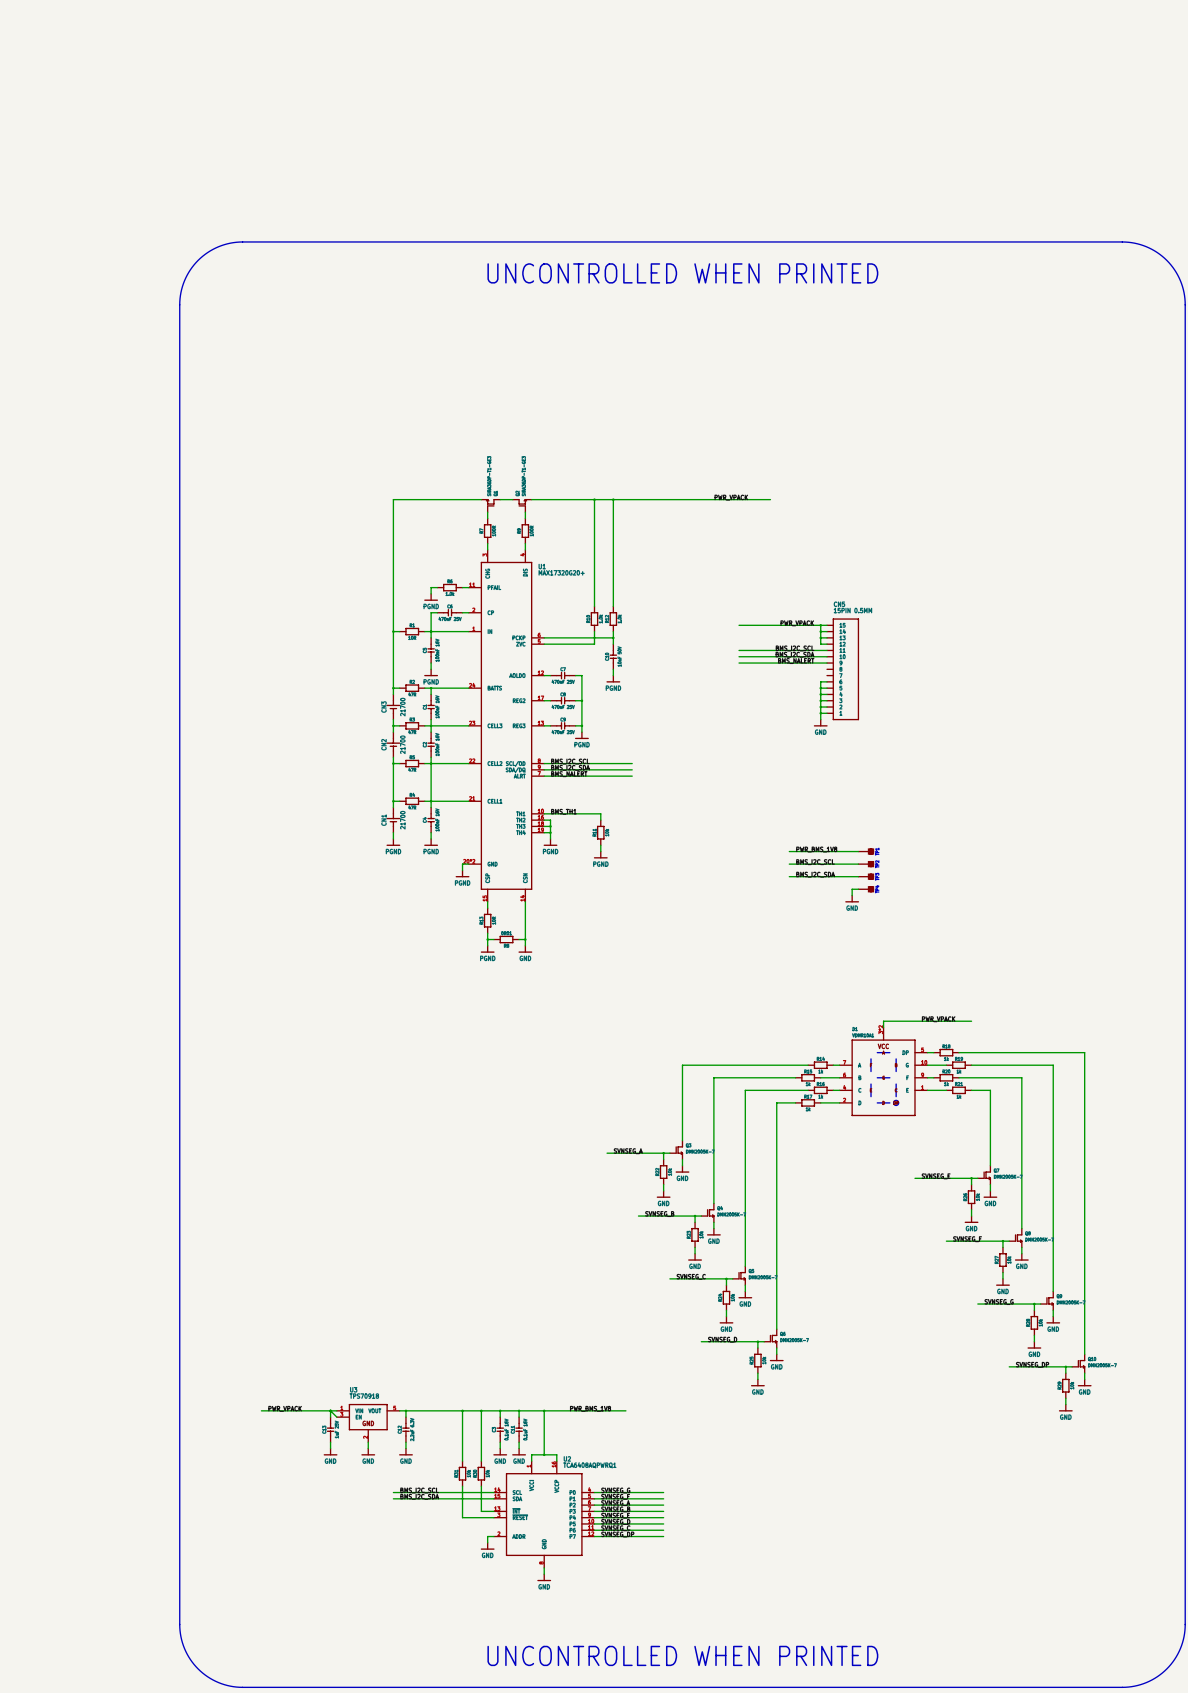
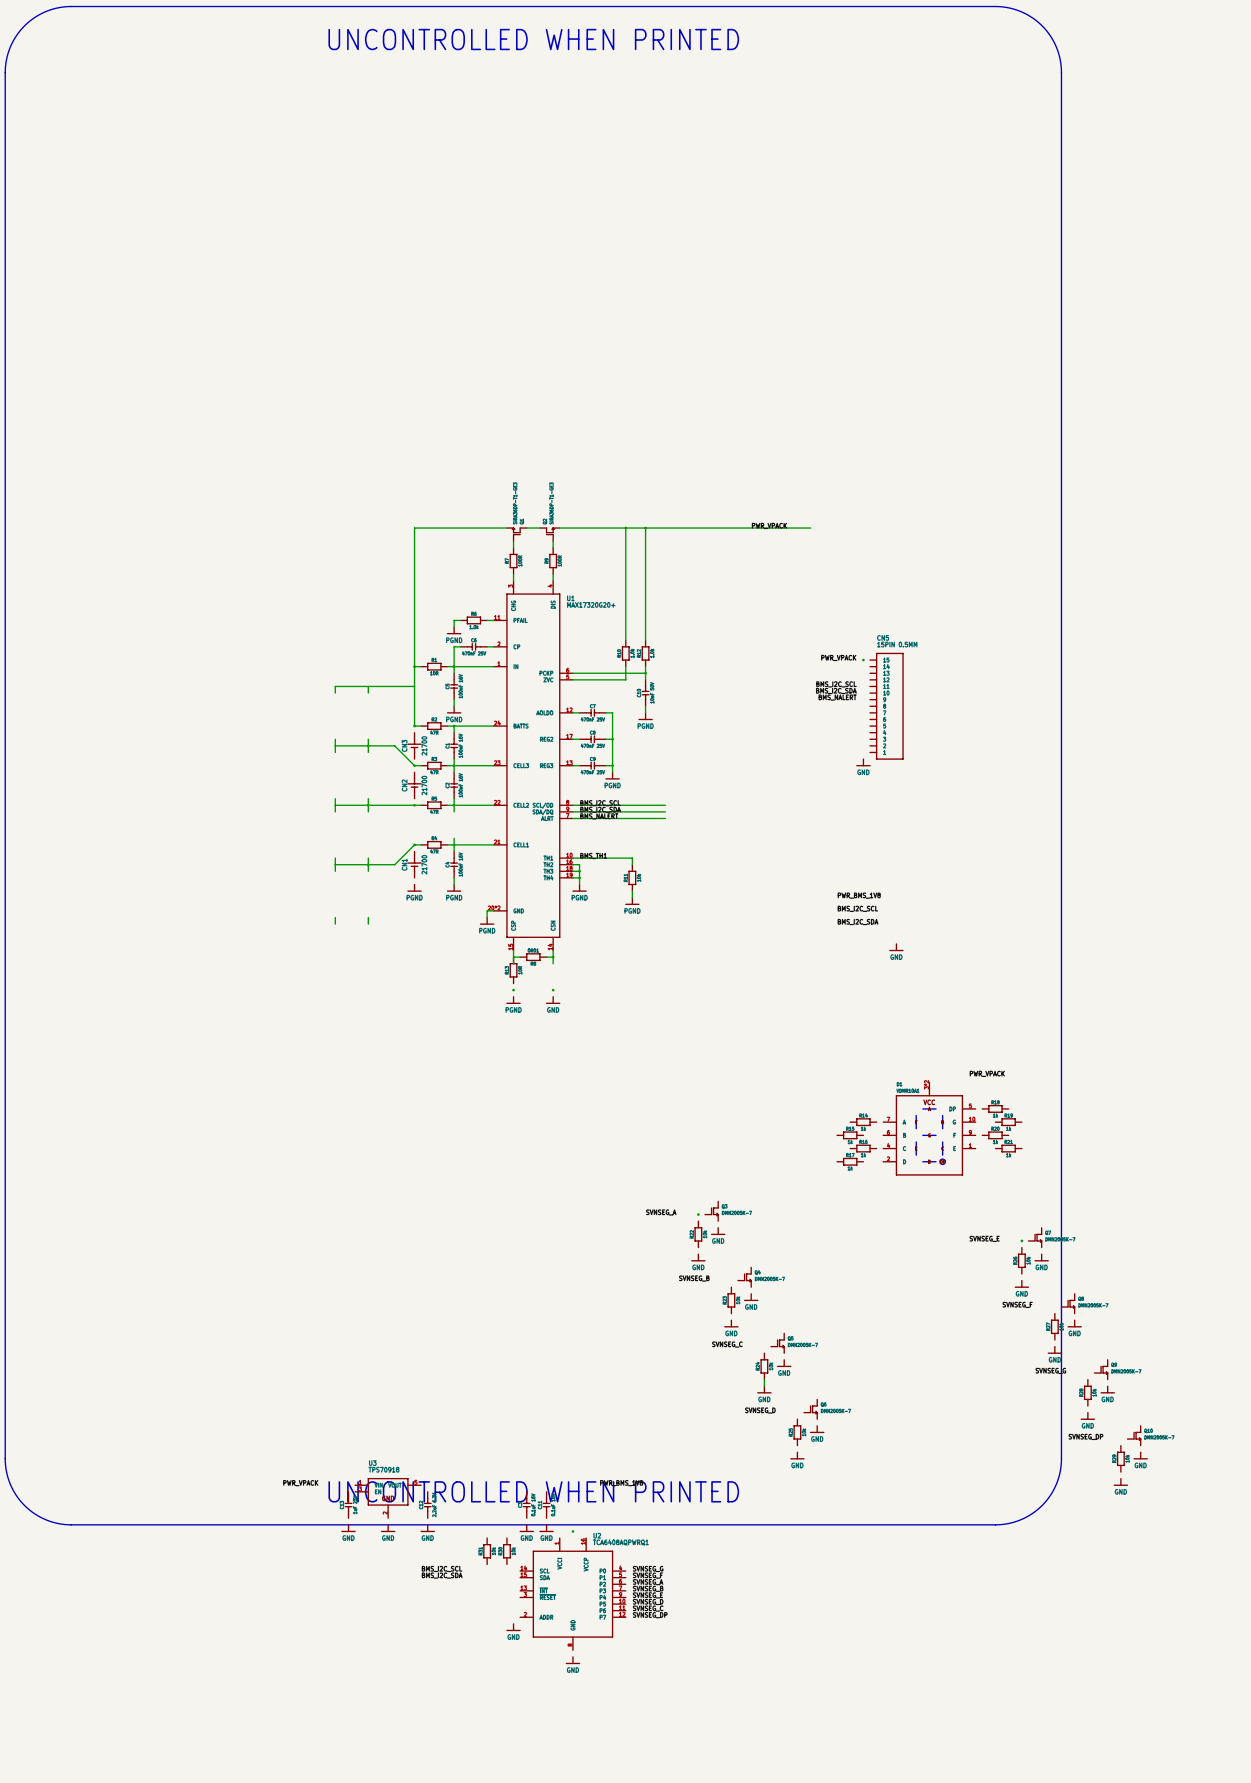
text: none -> UNCONTROLLED WHEN PRINTED (533, 39)
line: (242, 241) (1125, 242) (1137, 243) (1151, 249) (1164, 258) (1174, 269) (1182, 286) (1185, 304) (1185, 1624) (1183, 1639) (1177, 1654) (1168, 1666) (1157, 1676) (1140, 1684) (1122, 1687) (242, 1687) (227, 1685) (212, 1679) (200, 1671) (190, 1659) (182, 1642) (179, 1624) (179, 301) (185, 277) (200, 258) (221, 245) (242, 241) -> (71, 6) (998, 6) (1011, 8) (1026, 14) (1039, 23) (1050, 35) (1058, 53) (1061, 72) (1061, 1458) (1059, 1474) (1053, 1489) (1044, 1503) (1032, 1513) (1014, 1522) (995, 1524) (71, 1524) (55, 1522) (40, 1517) (26, 1507) (16, 1495) (8, 1477) (5, 1458) (5, 69) (11, 44) (26, 23) (49, 10) (71, 6)
text: UNCONTROLLED WHEN PRINTED (682, 273) -> none
wire: (739, 625) (827, 625) -> none
wire: (820, 625) (820, 644) (827, 644) -> none
wire: (820, 631) (827, 631) -> none
wire: (820, 637) (827, 637) -> none
wire: none -> (414, 686) (335, 686) (335, 693)
wire: (739, 650) (827, 650) -> none
wire: (739, 656) (827, 656) -> none
wire: (739, 663) (827, 663) -> none
wire: (827, 681) (820, 681) (820, 719) -> none
wire: (393, 688) (393, 694) -> (368, 686) (368, 693)
wire: (820, 688) (827, 688) -> none
wire: (820, 694) (827, 694) -> none
wire: none -> (335, 739) (335, 752)
wire: none -> (368, 739) (368, 752)
wire: (820, 700) (827, 700) -> none
wire: none -> (335, 745) (394, 745) (414, 765)
wire: (820, 707) (827, 707) -> none
wire: (820, 713) (827, 713) -> none
wire: (393, 719) (393, 732) -> (368, 798) (368, 811)
wire: none -> (335, 798) (335, 811)
wire: (393, 757) (393, 807) -> none
wire: none -> (335, 805) (414, 805)
wire: (431, 769) (431, 794) -> none
wire: none -> (414, 844) (394, 864) (335, 864)
wire: none -> (335, 858) (335, 871)
wire: none -> (368, 858) (368, 871)
wire: (393, 832) (393, 838) -> (368, 917) (368, 924)
wire: (789, 851) (858, 851) -> none
part: (866, 851) -> none
wire: (789, 864) (858, 864) -> none
part: (866, 864) -> none
wire: none -> (335, 917) (335, 924)
wire: (789, 876) (858, 876) -> none
part: (866, 876) -> none
wire: (858, 889) (852, 889) (852, 895) -> none
part: (866, 889) -> none
wire: none -> (520, 957) (513, 957) (513, 963)
wire: (525, 914) (525, 945) -> none
wire: (487, 933) (487, 945) -> none
wire: (487, 939) (493, 939) -> none
part position: (506, 939) -> (533, 957)
wire: (519, 939) (525, 939) -> (546, 957) (553, 957)
wire: (971, 1021) (883, 1021) (883, 1027) -> none
wire: (927, 1052) (933, 1052) -> none
wire: (958, 1052) (1084, 1052) (1084, 1354) -> none
wire: (808, 1065) (682, 1065) (682, 1140) -> none
wire: (833, 1065) (839, 1065) -> none
wire: (927, 1065) (946, 1065) -> none
wire: (971, 1065) (1053, 1065) (1053, 1291) -> none
wire: (795, 1077) (713, 1077) (713, 1203) -> none
wire: (820, 1077) (839, 1077) -> none
wire: (927, 1077) (933, 1077) -> none
wire: (958, 1077) (1021, 1077) (1021, 1228) -> none
wire: (808, 1090) (745, 1090) (745, 1266) -> none
wire: (833, 1090) (839, 1090) -> none
wire: (927, 1090) (946, 1090) -> none
wire: (971, 1090) (990, 1090) (990, 1165) -> none
wire: (795, 1102) (776, 1102) (776, 1329) -> none
wire: (820, 1102) (839, 1102) -> none
wire: (607, 1153) (669, 1153) -> none
wire: (663, 1153) (663, 1159) -> none
wire: (682, 1159) (682, 1165) -> none
wire: (914, 1178) (977, 1178) -> none
wire: (971, 1178) (971, 1184) -> none
wire: (663, 1184) (663, 1190) -> none
wire: (990, 1184) (990, 1190) -> none
wire: (971, 1209) (971, 1216) -> none
wire: (638, 1216) (701, 1216) -> none
wire: (695, 1216) (695, 1222) -> none
wire: (713, 1222) (713, 1228) -> none
wire: (946, 1241) (1009, 1241) -> none
wire: (1002, 1241) (1002, 1247) -> none
wire: (695, 1247) (695, 1253) -> none
wire: (1021, 1247) (1021, 1253) -> none
wire: (1002, 1272) (1002, 1278) -> none
wire: (669, 1278) (732, 1278) -> none
wire: (726, 1278) (726, 1285) -> none
wire: (745, 1285) (745, 1291) -> none
wire: (977, 1304) (1040, 1304) -> none
wire: (1034, 1304) (1034, 1310) -> none
wire: (1053, 1310) (1053, 1316) -> none
wire: (1034, 1335) (1034, 1341) -> none
wire: (701, 1341) (764, 1341) -> none
wire: (757, 1341) (757, 1348) -> none
wire: (776, 1348) (776, 1354) -> none
wire: (1009, 1366) (1072, 1366) -> none
wire: (1065, 1366) (1065, 1373) -> none
wire: (757, 1373) (757, 1379) -> none
wire: (1084, 1373) (1084, 1379) -> none
wire: (1065, 1398) (1065, 1404) -> none
wire: (261, 1410) (336, 1410) -> none
wire: (399, 1410) (625, 1410) -> none
wire: (405, 1410) (405, 1417) -> none
wire: (462, 1410) (462, 1461) -> none
wire: (481, 1410) (481, 1461) -> none
wire: (519, 1410) (519, 1417) -> none
wire: (544, 1410) (544, 1454) -> none
text: none -> UNCONTROLLED WHEN PRINTED (533, 1491)
wire: (330, 1442) (330, 1448) -> none
wire: (368, 1442) (368, 1448) -> none
wire: (405, 1442) (405, 1448) -> none
wire: (500, 1442) (500, 1448) -> none
wire: (519, 1442) (519, 1448) -> none
wire: (531, 1461) (531, 1454) (556, 1454) (556, 1461) -> none
wire: (462, 1486) (462, 1517) (493, 1517) -> none
wire: (481, 1486) (481, 1511) (493, 1511) -> none
wire: (393, 1492) (493, 1492) -> none
wire: (594, 1492) (663, 1492) -> none
wire: (393, 1498) (493, 1498) -> none
wire: (594, 1498) (663, 1498) -> none
wire: (594, 1505) (663, 1505) -> none
wire: (594, 1511) (663, 1511) -> none
wire: (594, 1517) (663, 1517) -> none
wire: (594, 1523) (663, 1523) -> none
wire: (594, 1530) (663, 1530) -> none
wire: (493, 1536) (487, 1536) (487, 1542) -> none
wire: (594, 1536) (663, 1536) -> none
wire: (544, 1567) (544, 1574) -> none
text: UNCONTROLLED WHEN PRINTED (682, 1655) -> none

